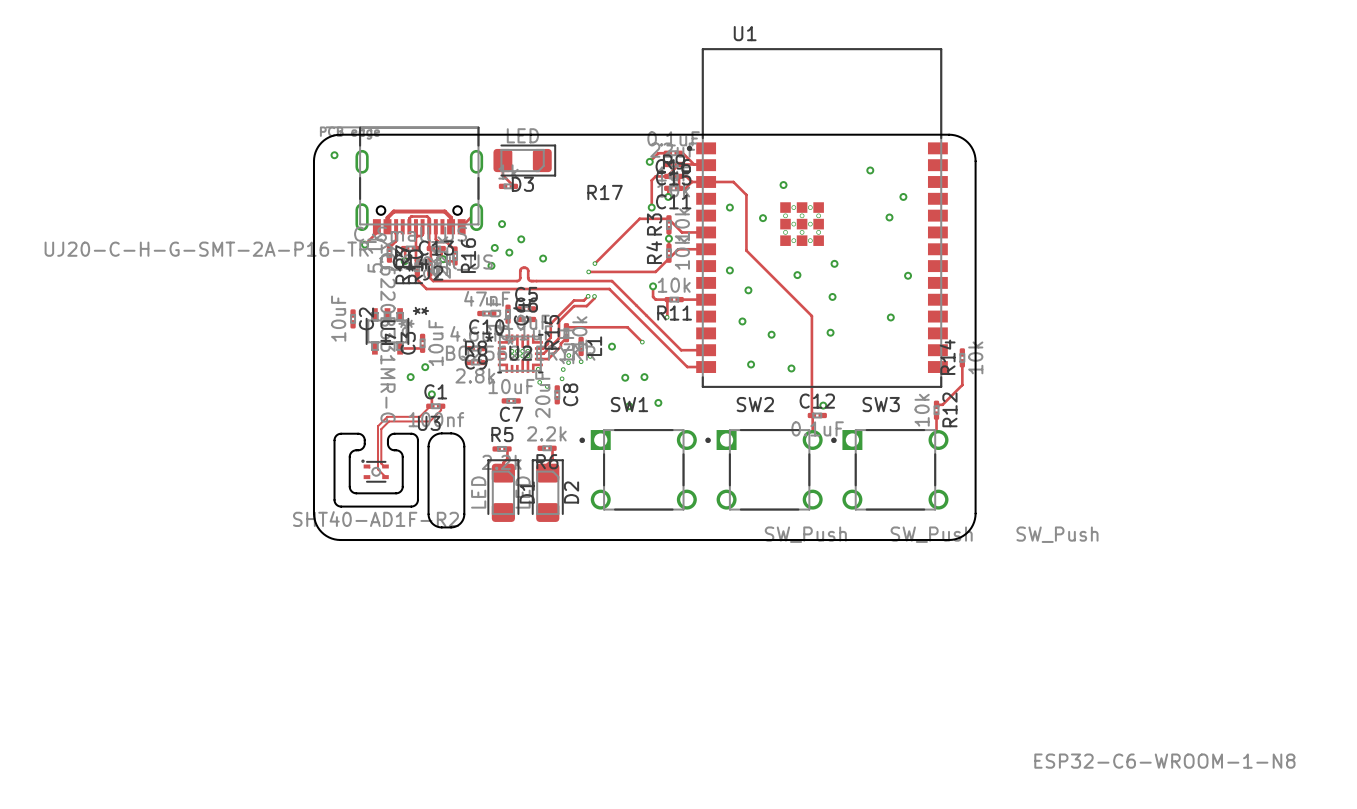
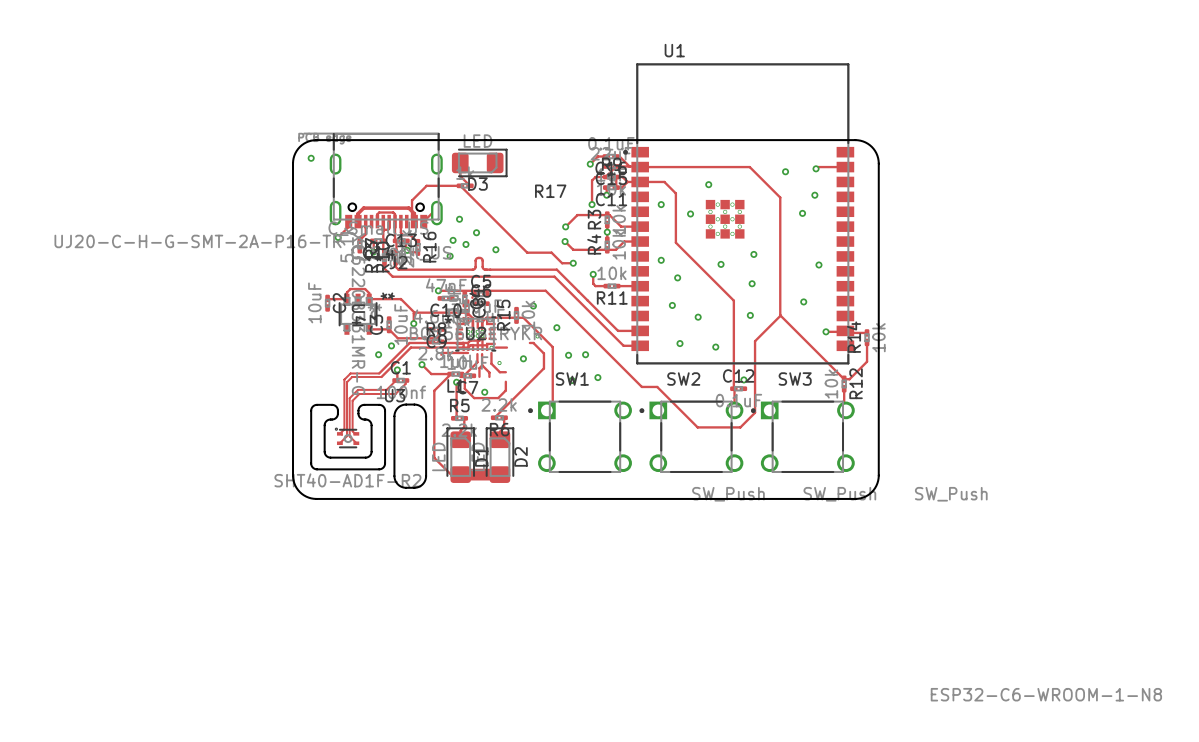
track: none -> (640, 167) (749, 167) (780, 197) (780, 315) (844, 379)
track: none -> (845, 167) (817, 167) (816, 168)
via: none -> (816, 168)
track: none -> (414, 221) (412, 219) (412, 200) (426, 185) (460, 185) (527, 252) (551, 252) (562, 263) (573, 263)
via: none -> (565, 226)
track: (684, 232) (682, 232) (668, 218) (639, 218) (594, 263) -> (621, 226) (609, 215) (577, 215) (565, 226)
via: none -> (565, 241)
track: (688, 249) (678, 249) (655, 271) (588, 271) -> (624, 241) (615, 249) (573, 249) (565, 241)
via: (594, 263) -> none
via: (588, 271) -> none
via: none -> (573, 263)
track: (588, 296) (583, 300) (574, 300) (550, 323) (550, 337) (547, 343) (543, 348) (538, 348) -> none
via: (588, 296) -> none
track: (594, 296) (586, 306) (574, 306) (559, 321) (559, 338) (543, 353) (538, 353) -> none
via: (594, 296) -> none
track: (668, 299) (667, 317) -> none
track: none -> (438, 290) (545, 290) (641, 386) (657, 386) (697, 427) (740, 427) (755, 412) (755, 341) (780, 315)
via: none -> (438, 290)
track: none -> (472, 297) (472, 297)
track: none -> (327, 298) (346, 299) (346, 292) (350, 289) (365, 289) (369, 293) (369, 299) (400, 299)
track: none -> (400, 299) (414, 312)
via: (667, 317) -> none
via: none -> (533, 306)
track: (566, 327) (627, 327) (642, 342) -> none
track: none -> (414, 312) (413, 323)
track: none -> (414, 312) (467, 312) (472, 318) (472, 331)
track: (566, 338) (548, 359) (538, 359) -> none
via: none -> (413, 323)
via: (642, 342) -> none
L1 rotation: 0° (581, 346) -> 90° clockwise (455, 374)
L1 position: (581, 346) -> (455, 374)
track: none -> (389, 329) (397, 338) (438, 338) (438, 329)
track: none -> (482, 329) (482, 322) (486, 317) (523, 317) (552, 347) (552, 404) (546, 410)
track: none -> (826, 331) (867, 332)
via: none -> (826, 331)
via: (568, 355) -> none
track: none -> (485, 338) (463, 342)
via: (581, 361) -> none
via: (568, 362) -> none
track: none -> (462, 342) (409, 342) (379, 373) (350, 373) (344, 379) (344, 429) (339, 433)
track: none -> (529, 342) (533, 342) (543, 353) (543, 368) (494, 417)
track: none -> (487, 345) (470, 345) (468, 347) (410, 347) (381, 376) (352, 376) (347, 382) (347, 436) (339, 443)
track: none -> (495, 347) (506, 347)
via: (563, 369) -> none
track: none -> (468, 352) (443, 352) (441, 354)
track: none -> (491, 352) (491, 363) (499, 372) (505, 372)
track: none -> (477, 354) (477, 362) (464, 374) (464, 388) (474, 398) (498, 398) (505, 390) (505, 381)
track: none -> (482, 354) (479, 376)
via: (562, 378) -> none
via: none -> (523, 358)
via: (539, 382) -> none
track: none -> (422, 364) (431, 374) (451, 374) (434, 390) (434, 457) (451, 474) (499, 474)
via: none -> (422, 364)
track: none -> (482, 365) (489, 372) (489, 376)
C8 position: (557, 394) -> (467, 307)
track: none -> (456, 382) (456, 416) (454, 418)
via: none -> (456, 382)
via: none -> (484, 392)

